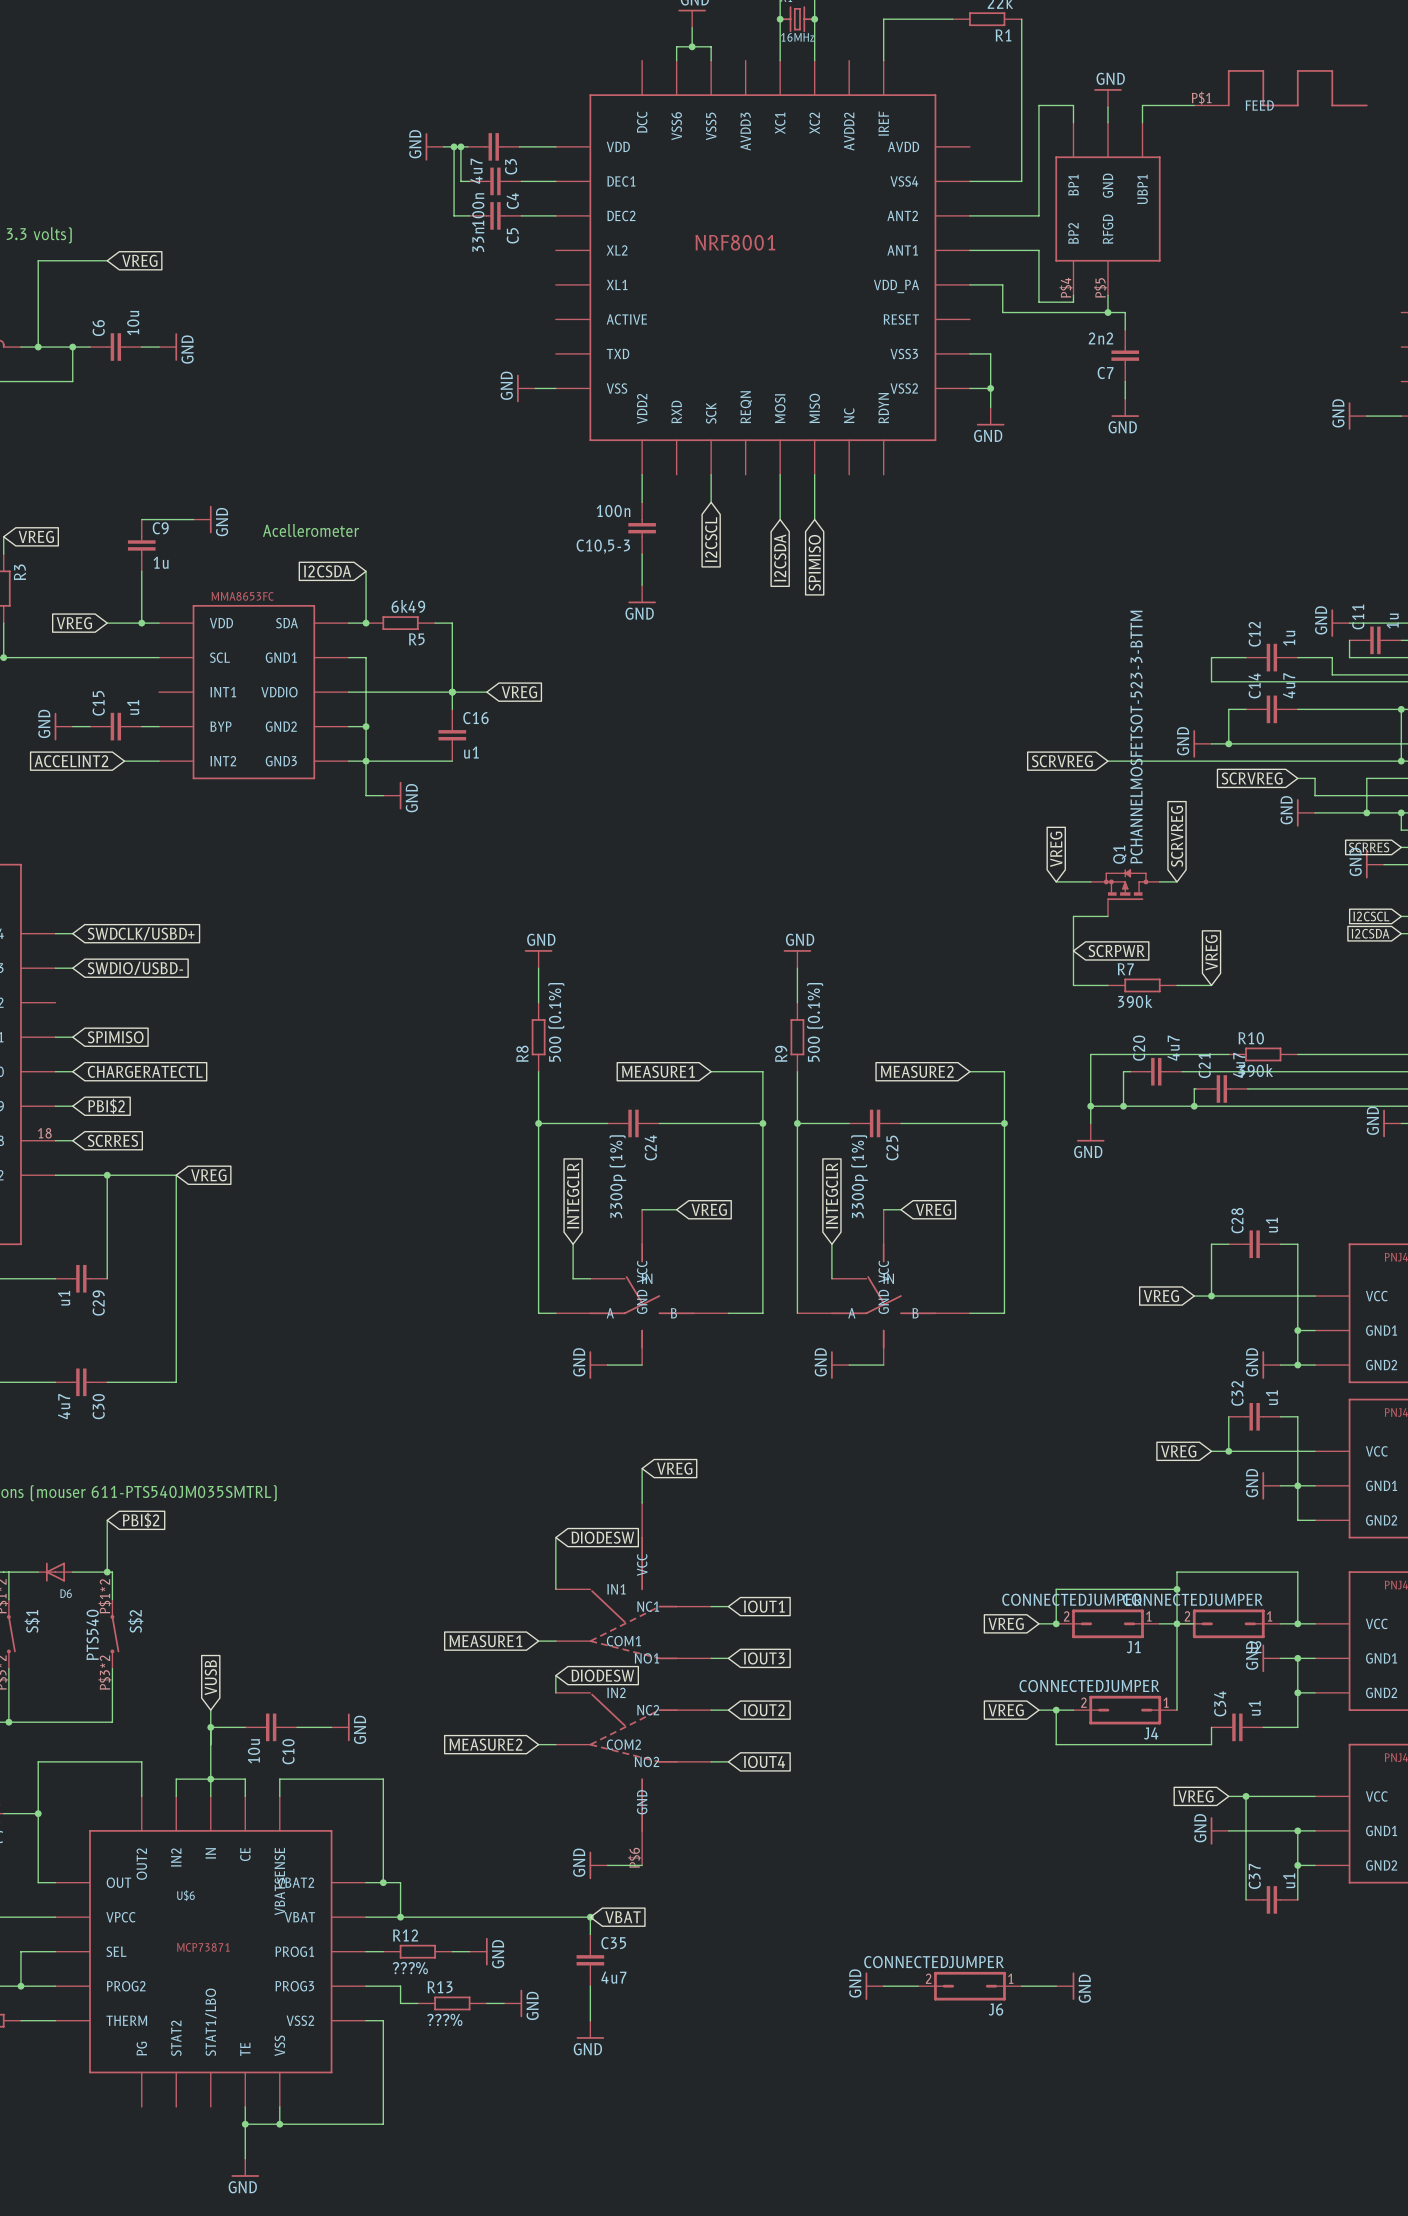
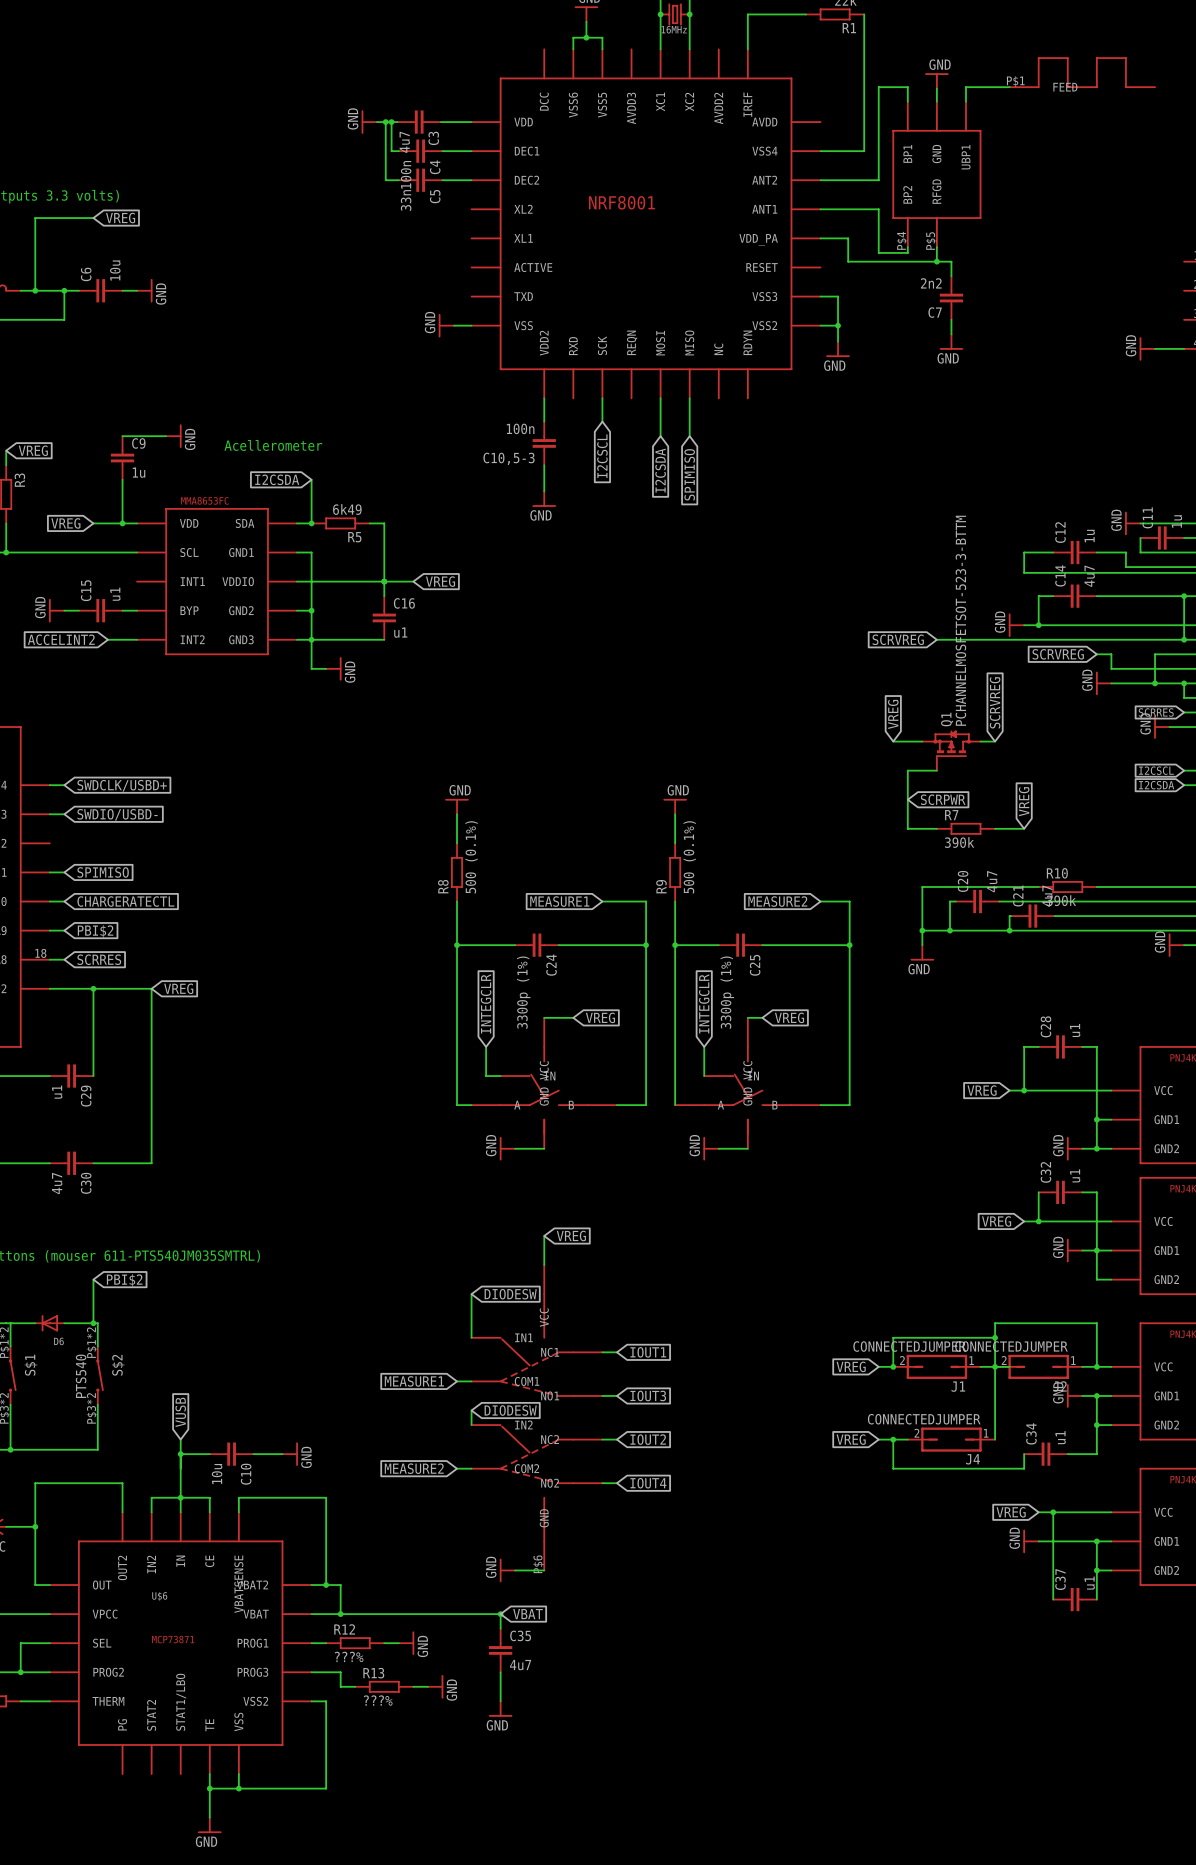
power symbol: GND (874, 1986) -> none
wire: (883, 1986) (918, 1986) -> none
J6: CONNECTEDJUMPER (969, 1986) -> none
wire: (1021, 1986) (1056, 1986) -> none
power symbol: GND (1065, 1986) -> none

